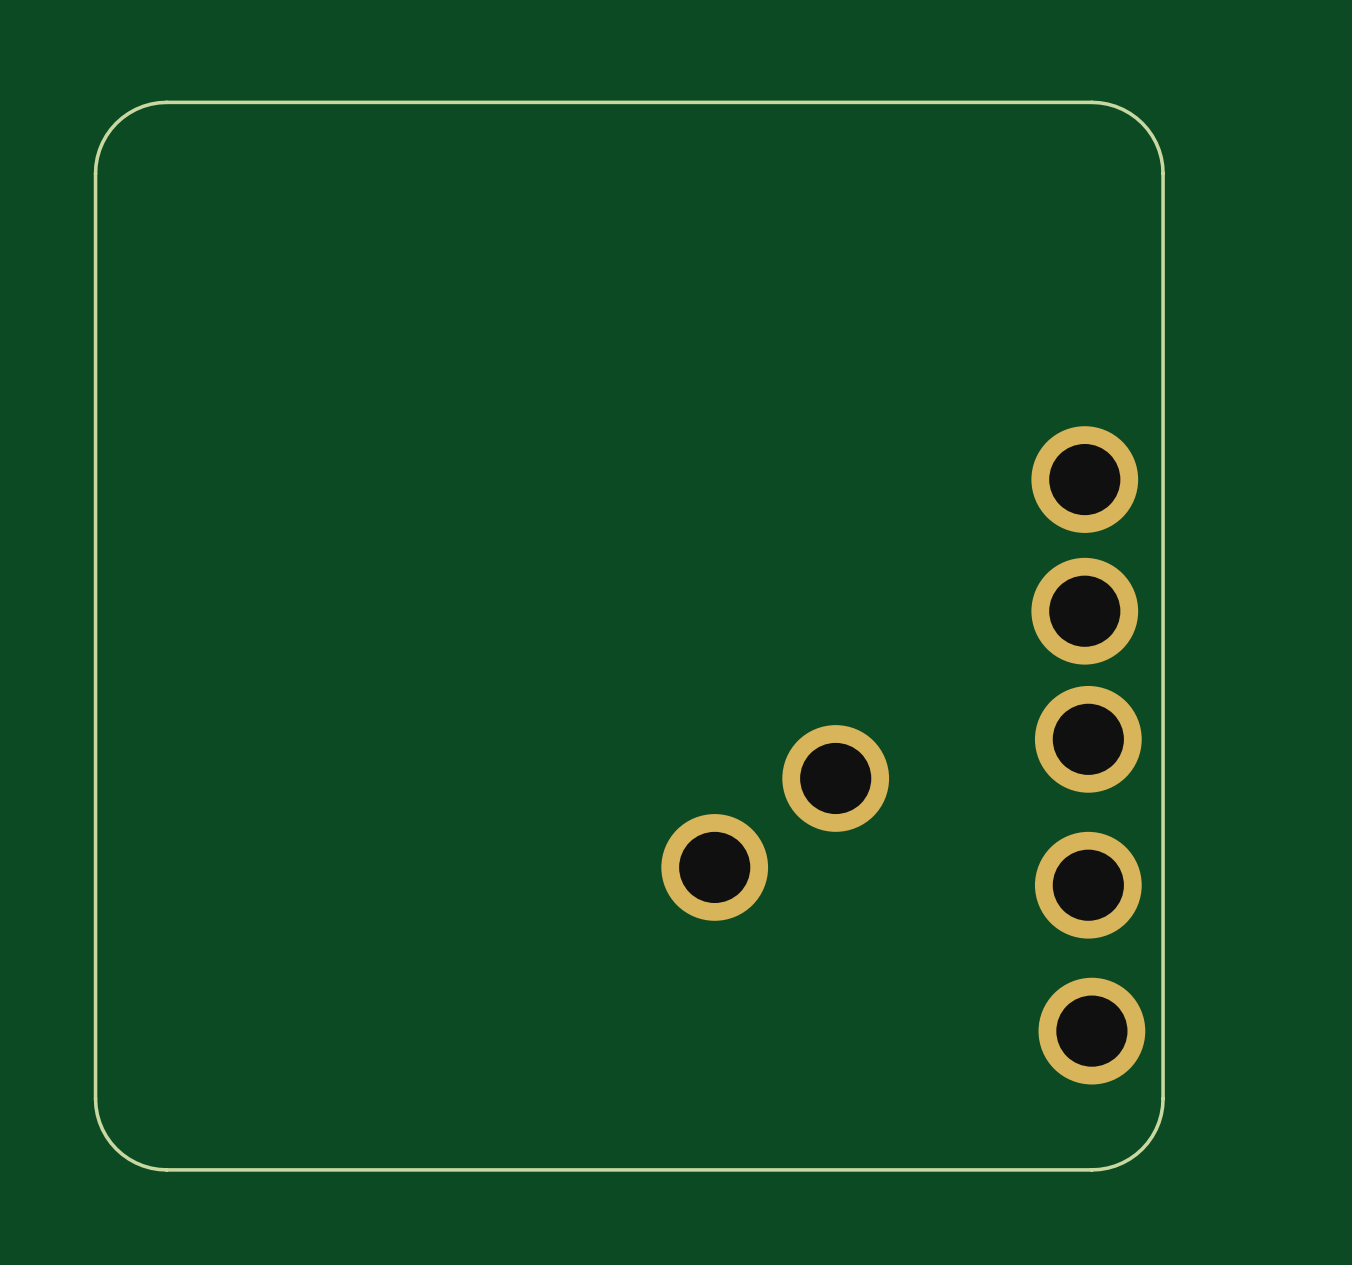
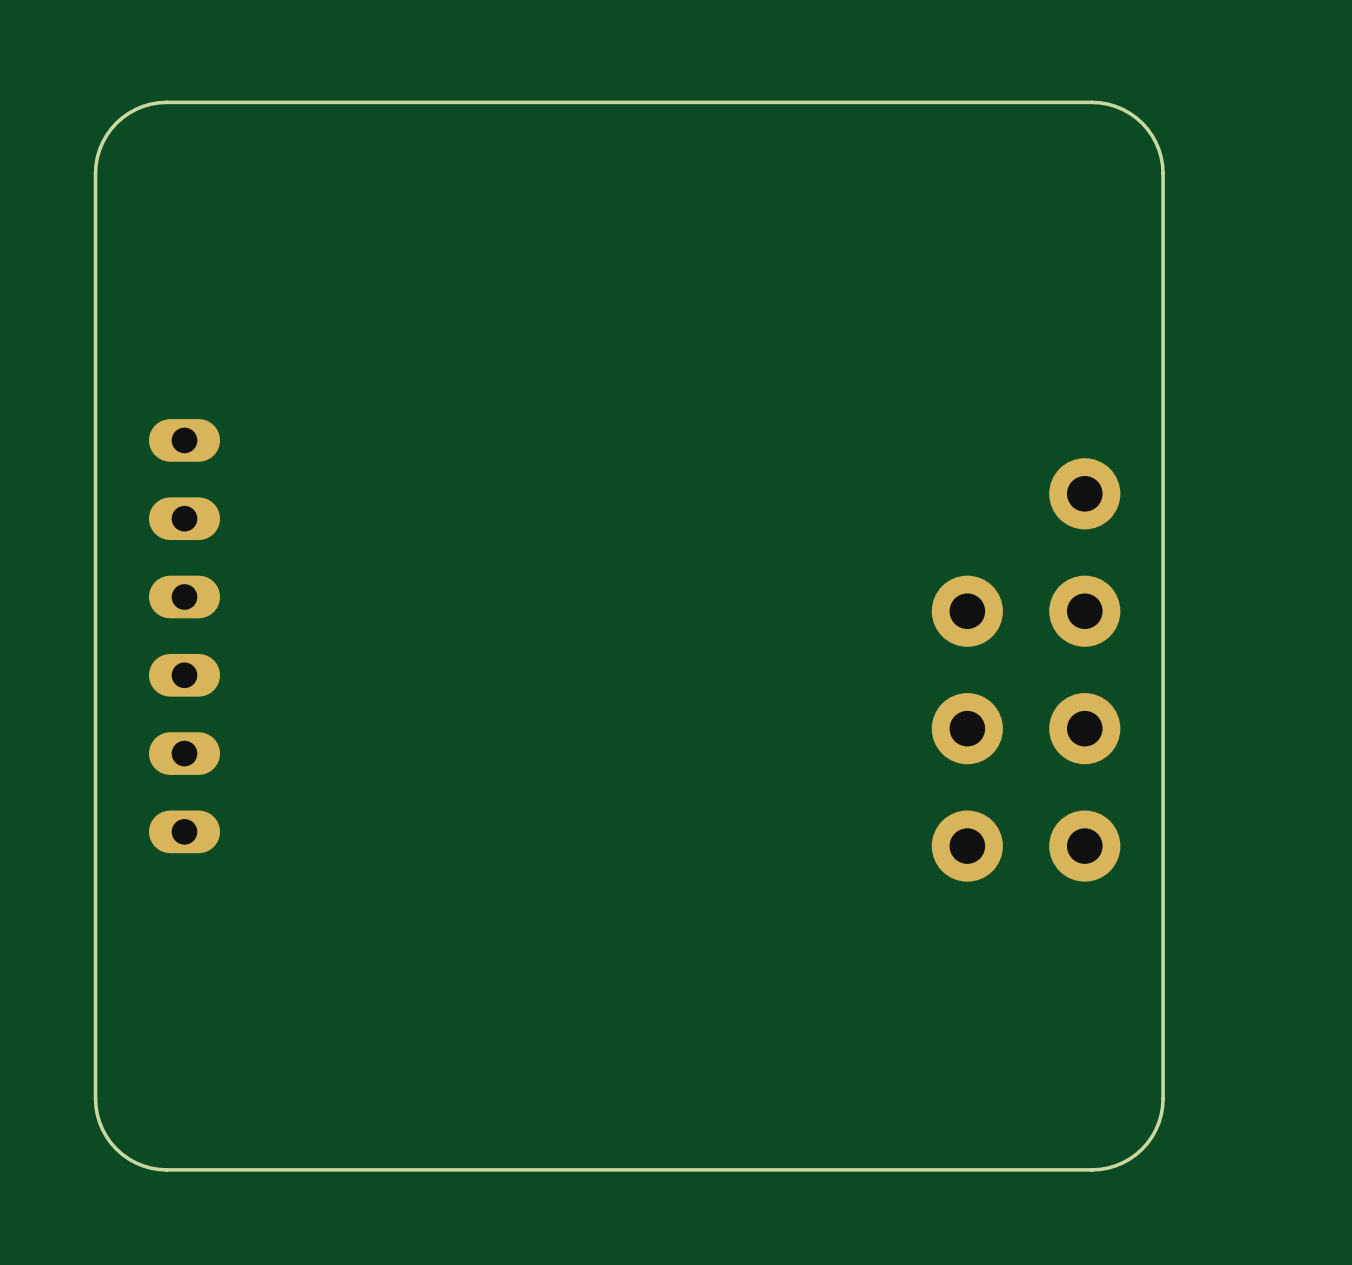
part footprint: [1031, 426, 1139, 533] -> [1049, 458, 1121, 530]
part footprint: [1031, 557, 1139, 665] -> [1049, 575, 1121, 647]
part: none -> (967, 611)
part: none -> (184, 636)
part footprint: [1034, 685, 1142, 793] -> [1049, 693, 1121, 765]
part: none -> (967, 728)
part: (835, 778) -> none
part: none -> (967, 846)
part: none -> (1084, 846)
part: (714, 867) -> none
part: (1088, 885) -> none
part: (1091, 1031) -> none

